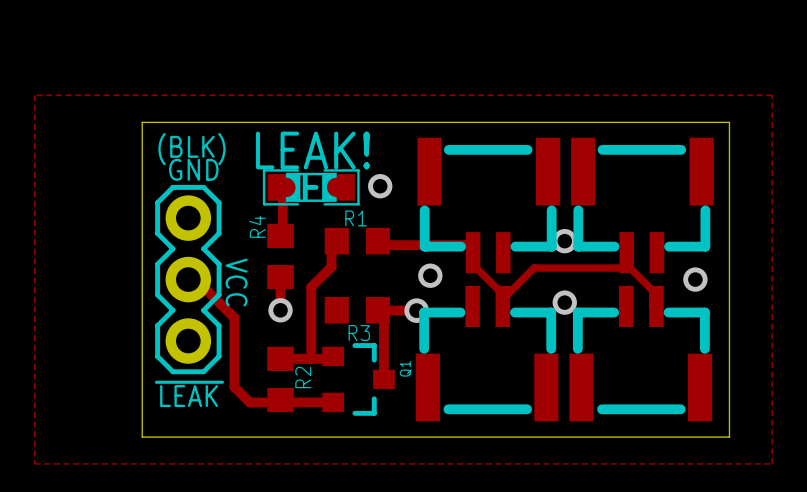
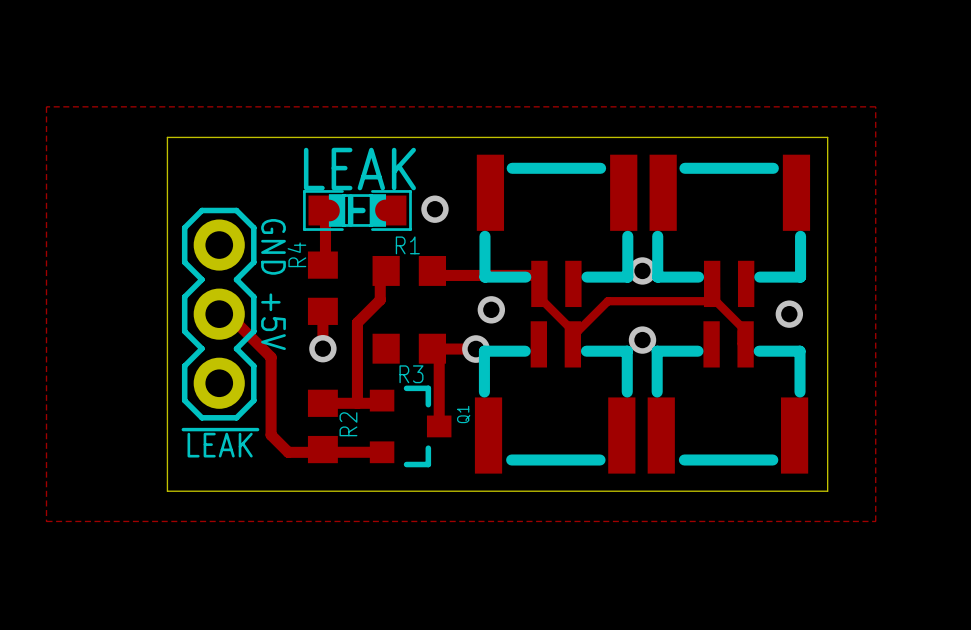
text: (BLK) (191, 149) -> none
text: LEAK! (313, 150) -> LEAK (359, 169)
text rotation: 0° (193, 169) -> 90° clockwise (273, 246)
text: VCC (236, 282) -> +5V (273, 321)

